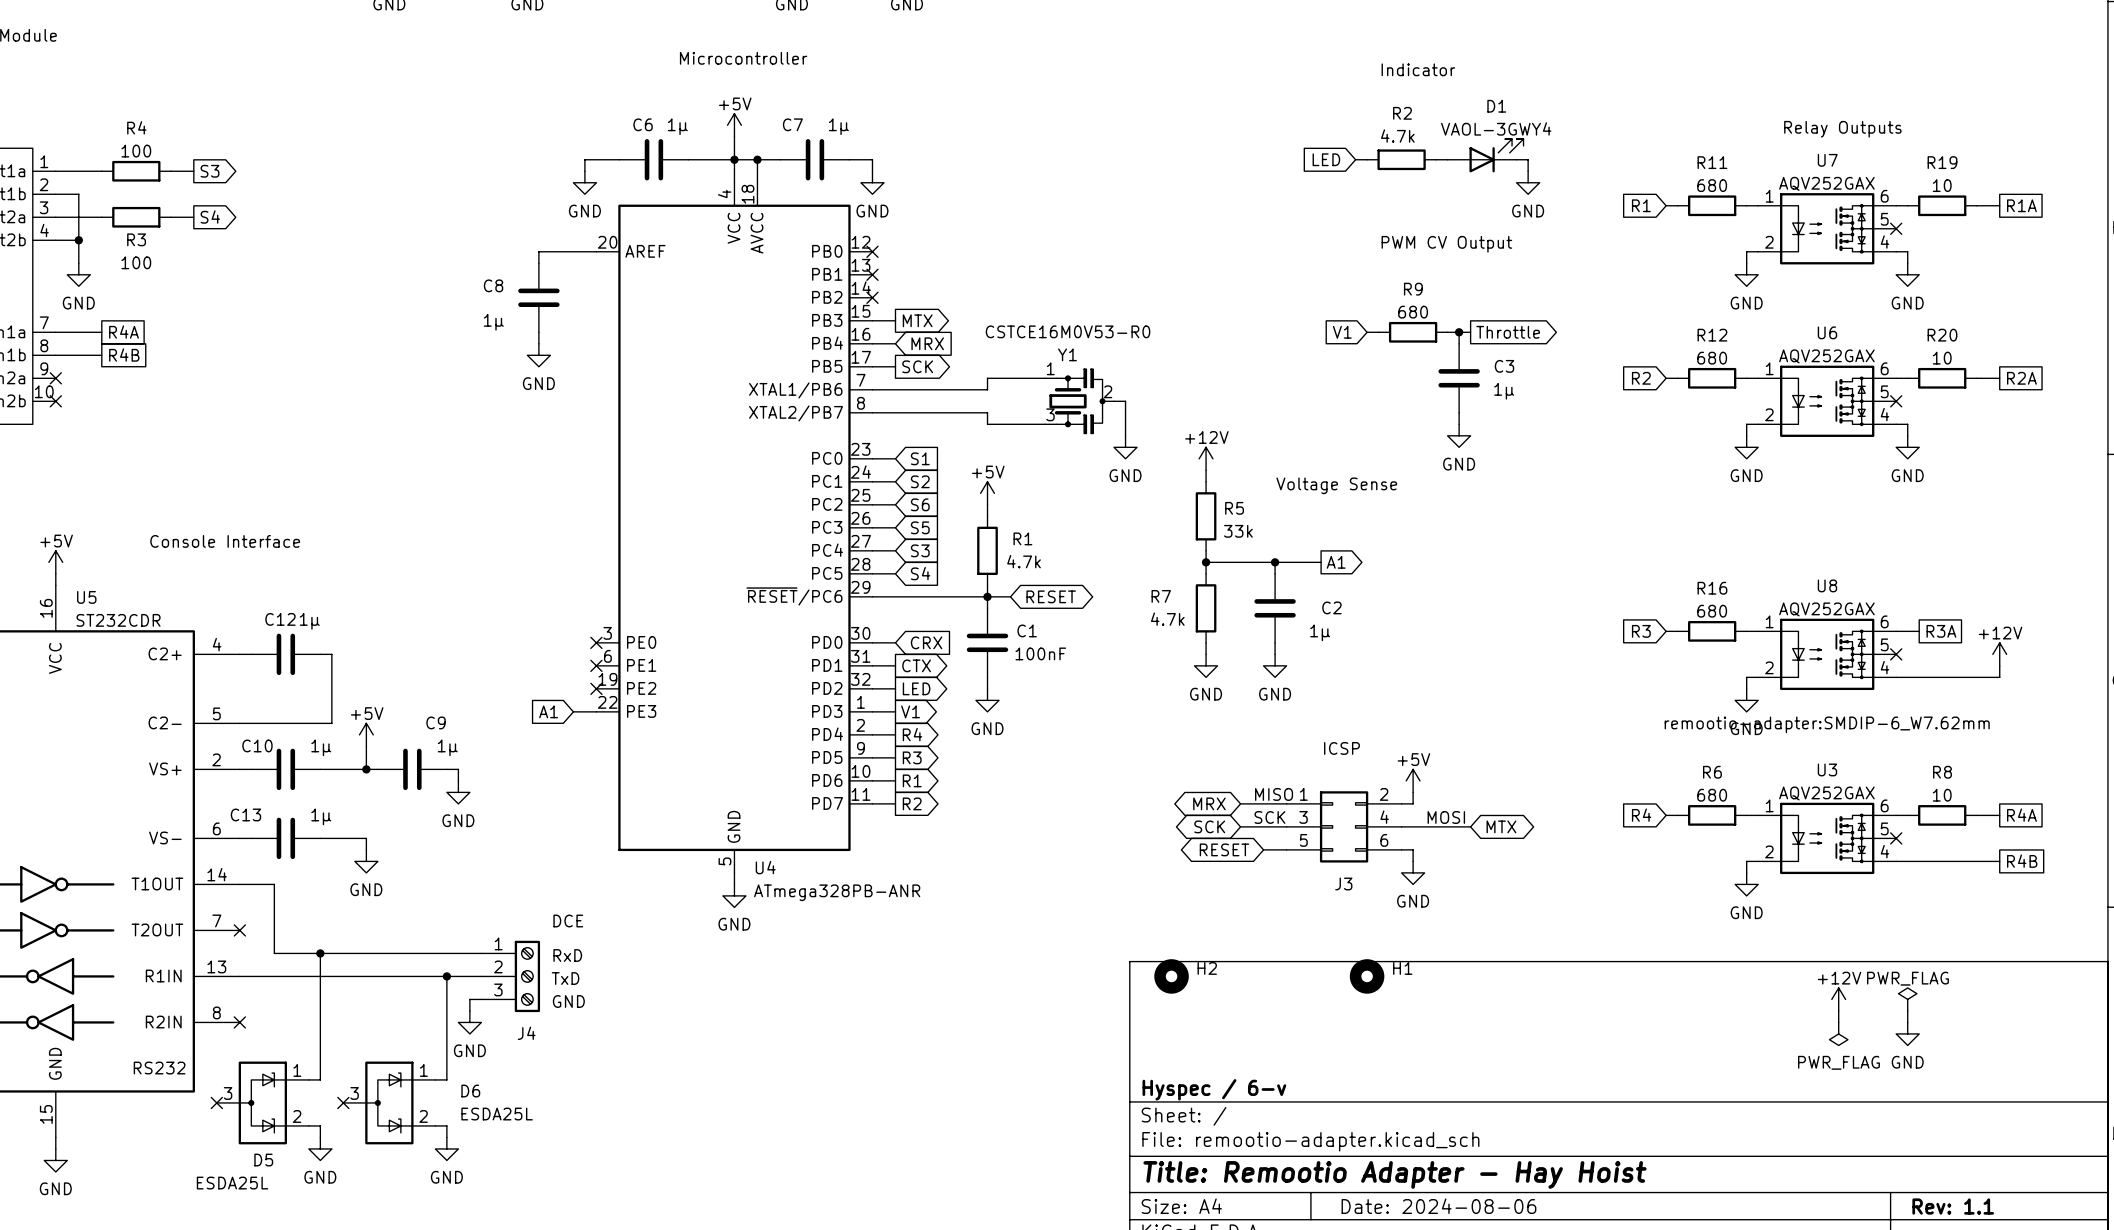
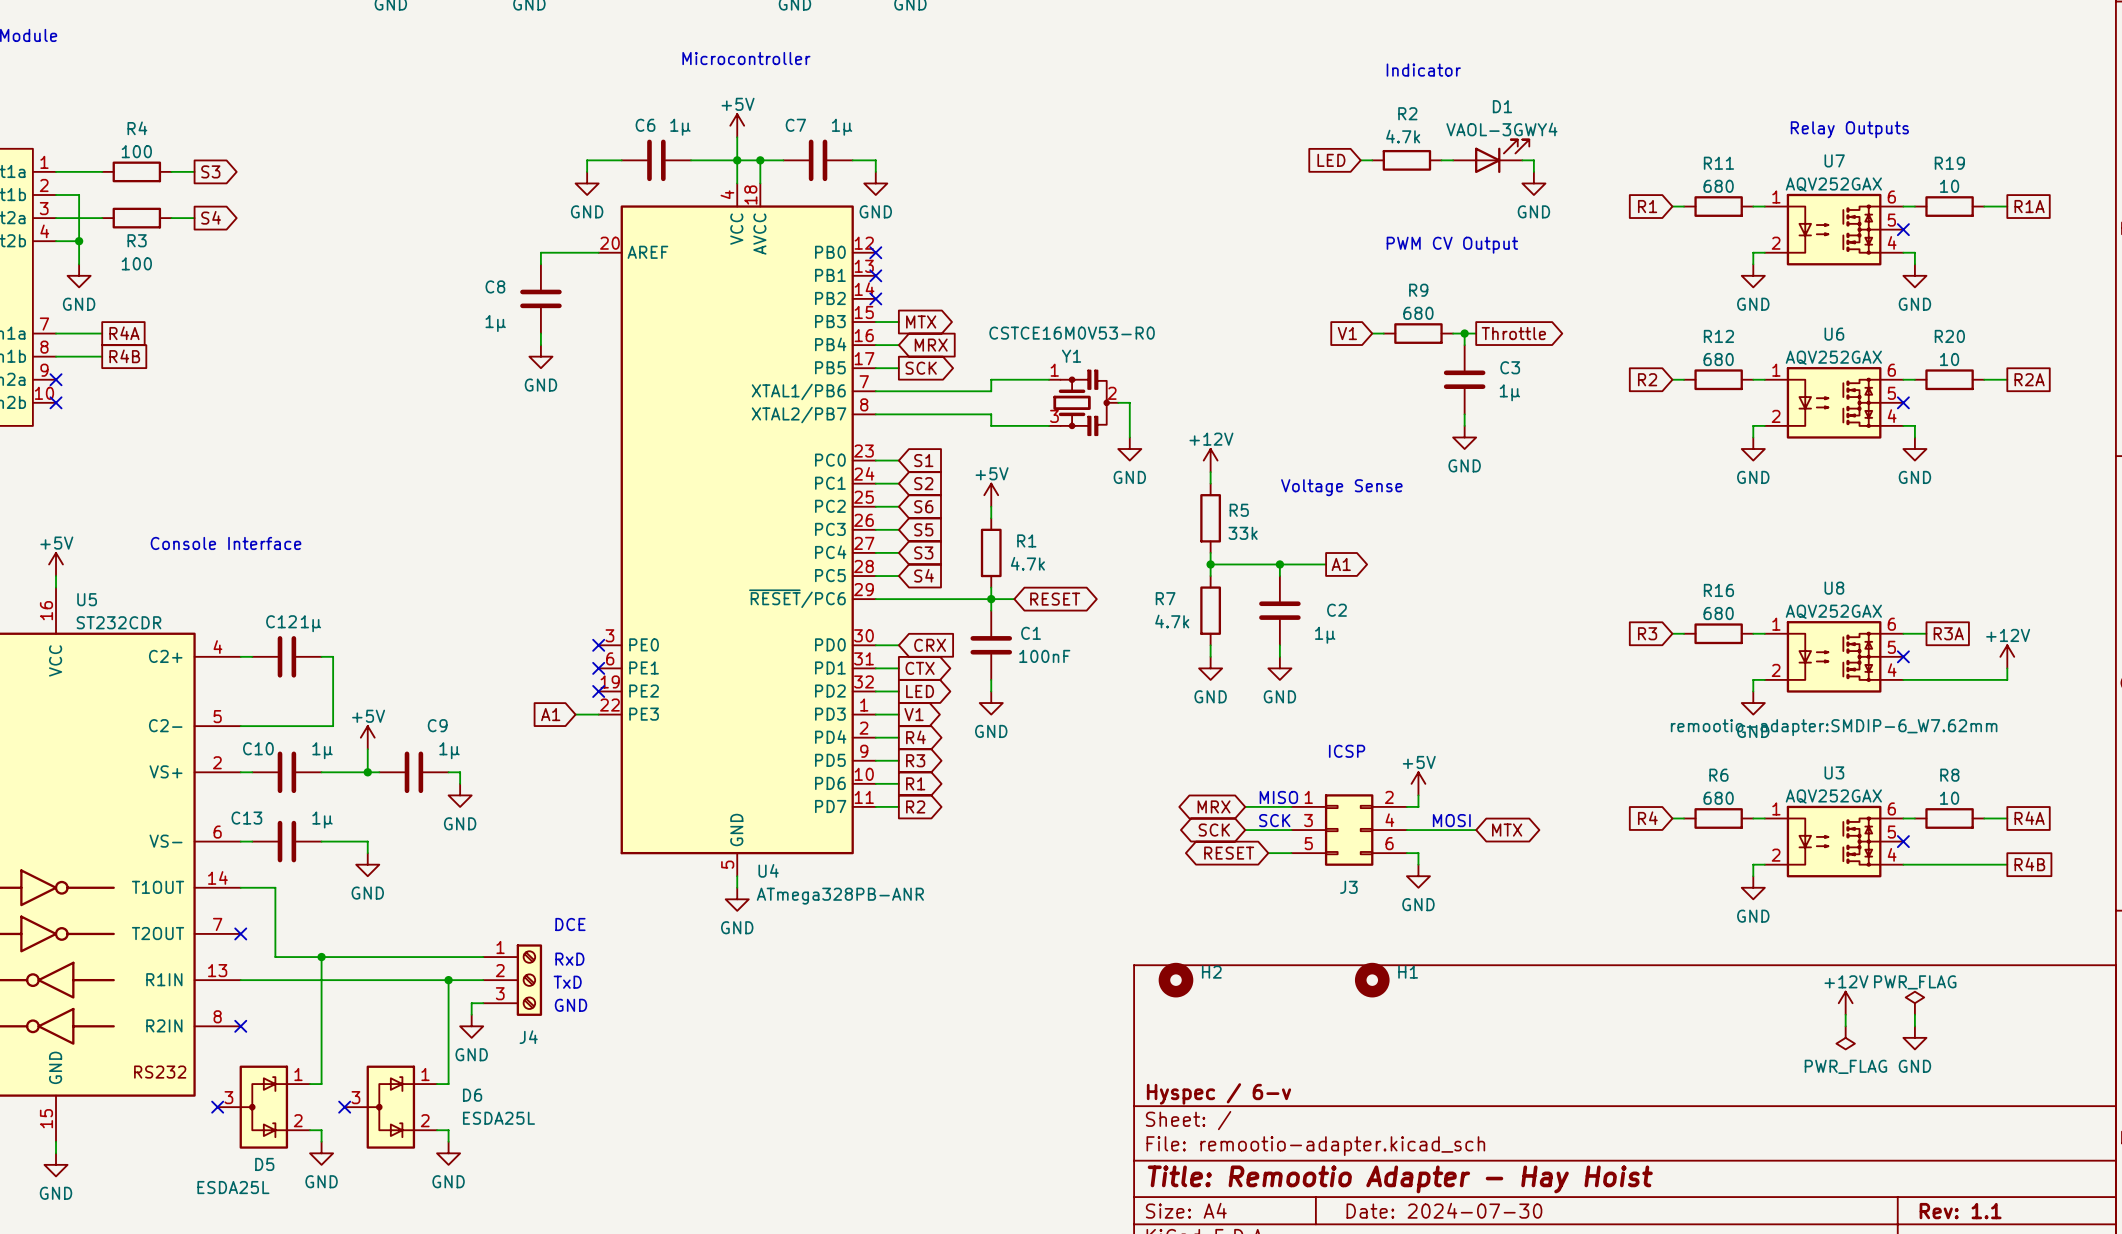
title block: Date: 2024-08-06 (1438, 1206) -> Date: 2024-07-30 (1444, 1210)

